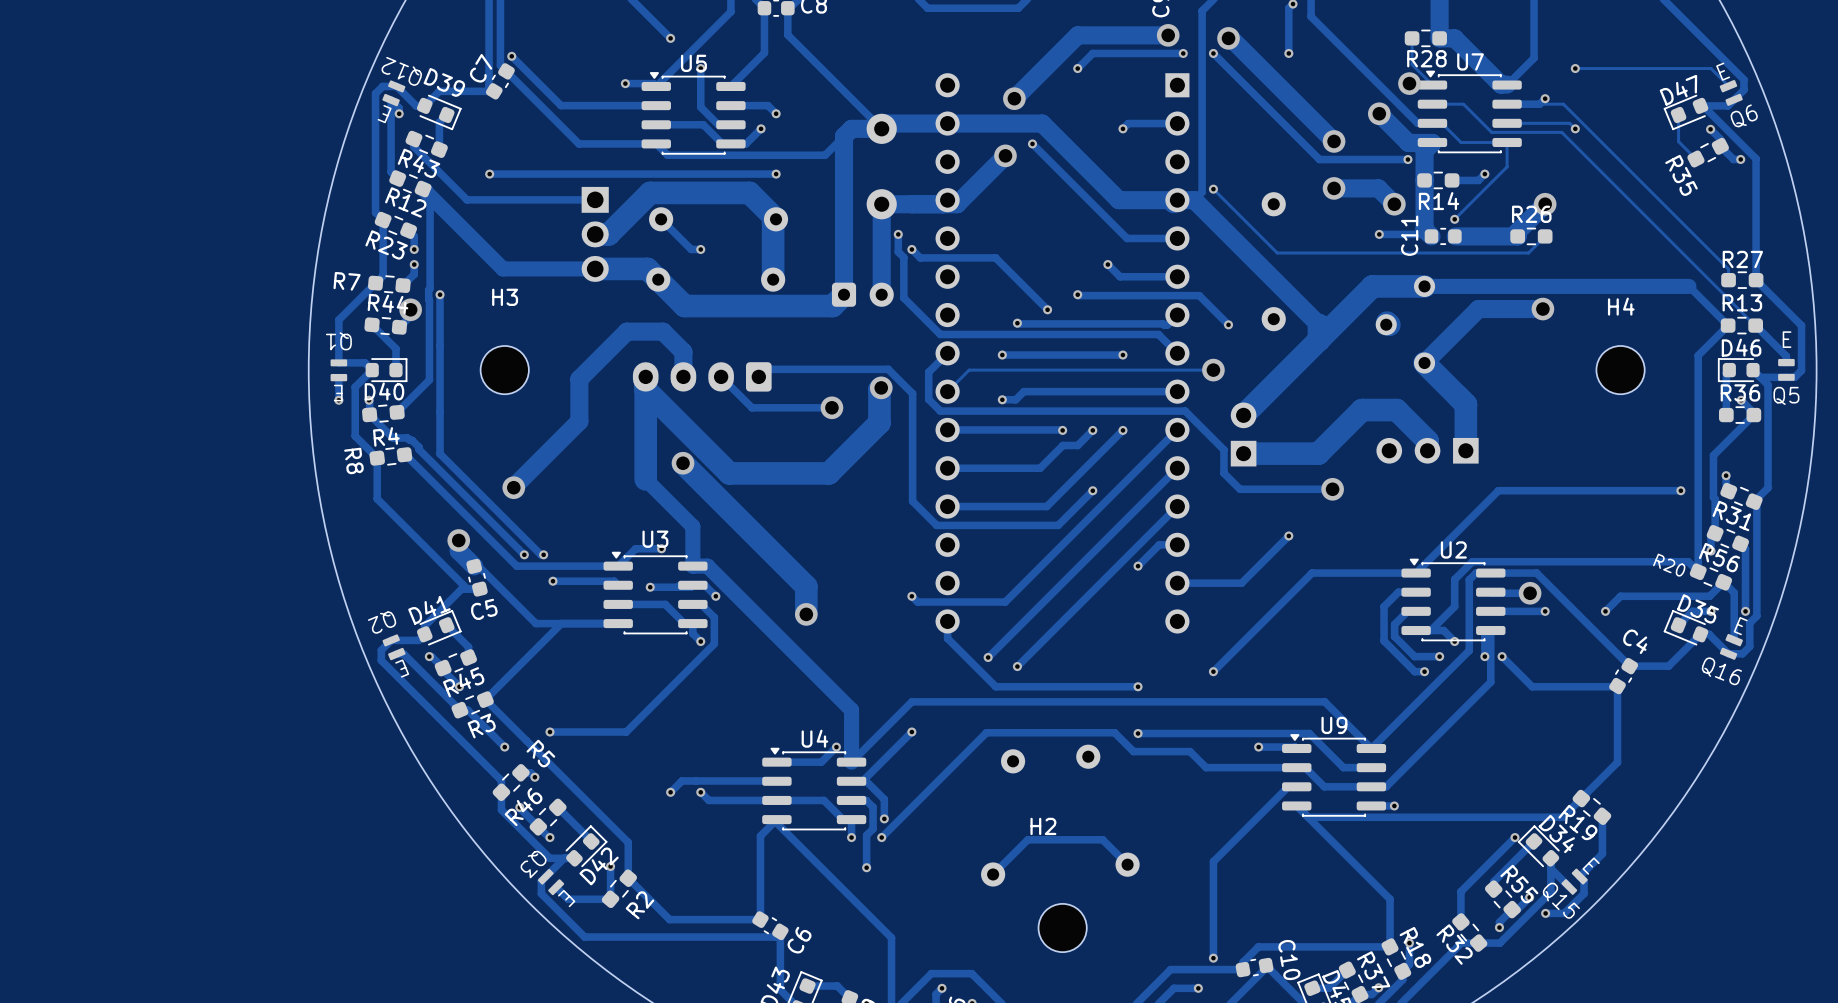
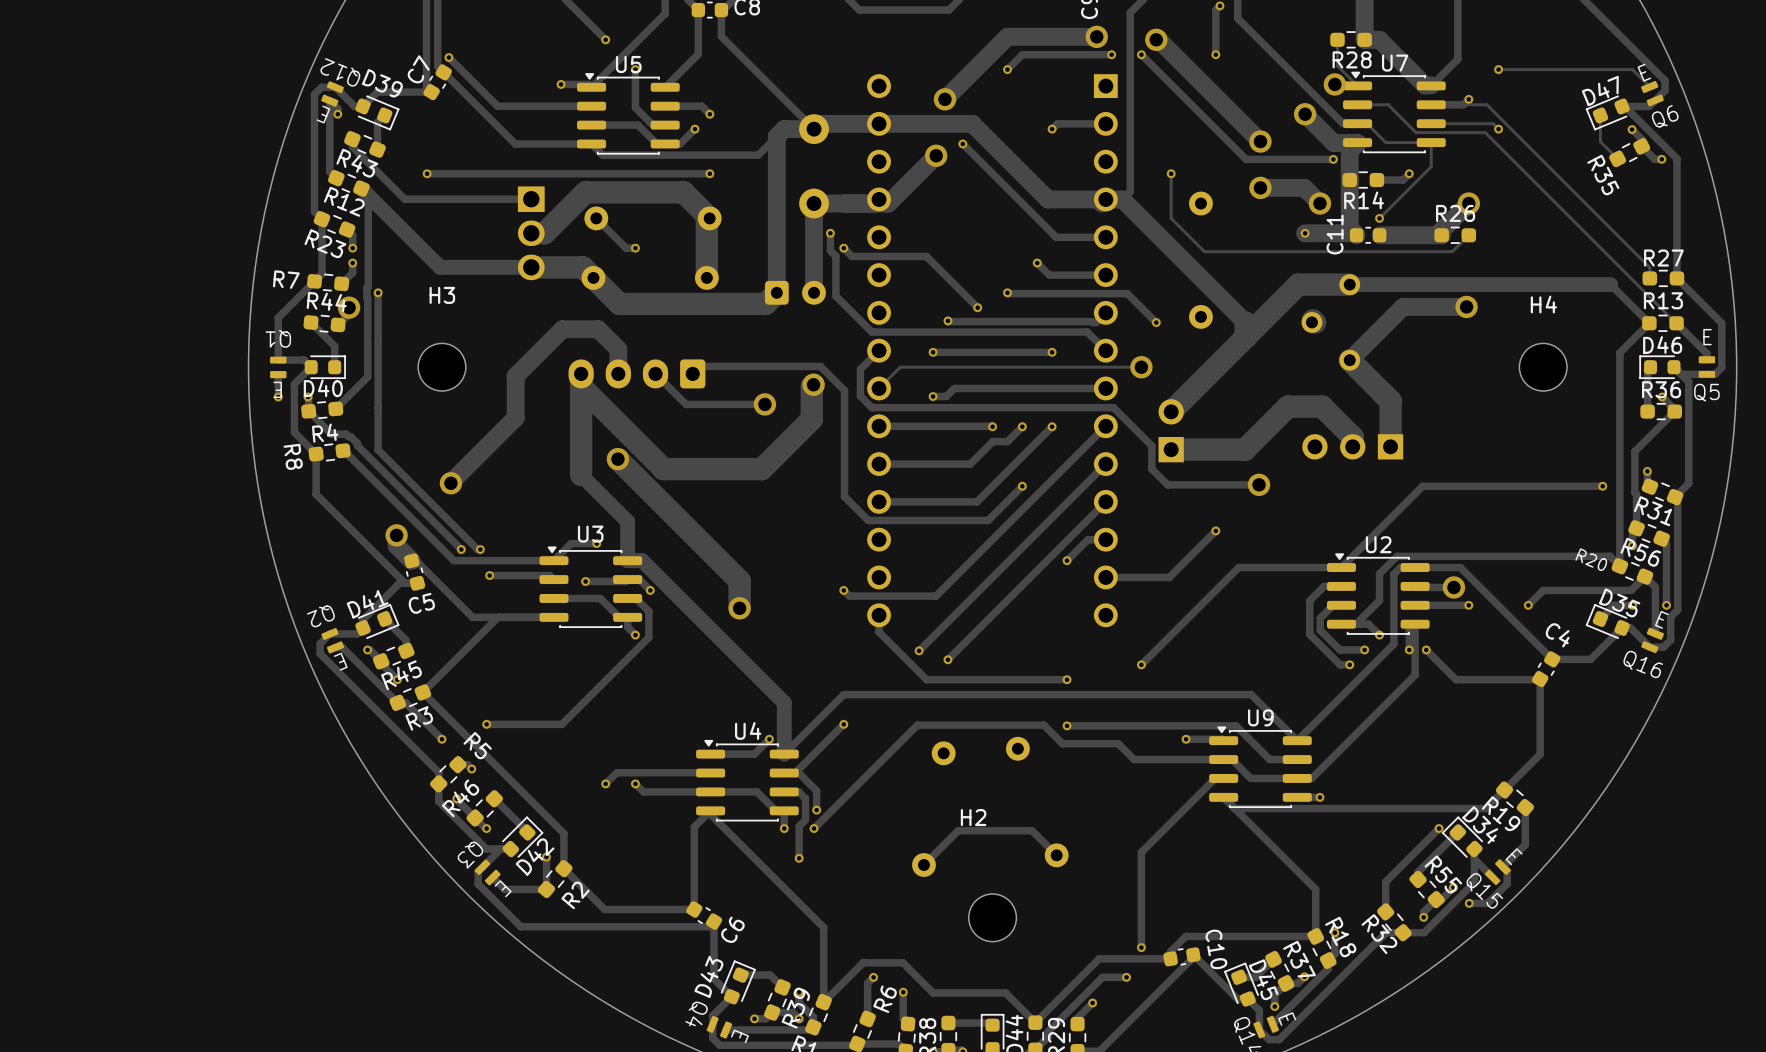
track: (1213, 189) (1243, 219) -> (1171, 173) (1171, 218)
via position: (1213, 189) -> (1171, 173)
track width: thin (1379, 234) (1429, 234) -> thick (1305, 233) (1354, 233)

